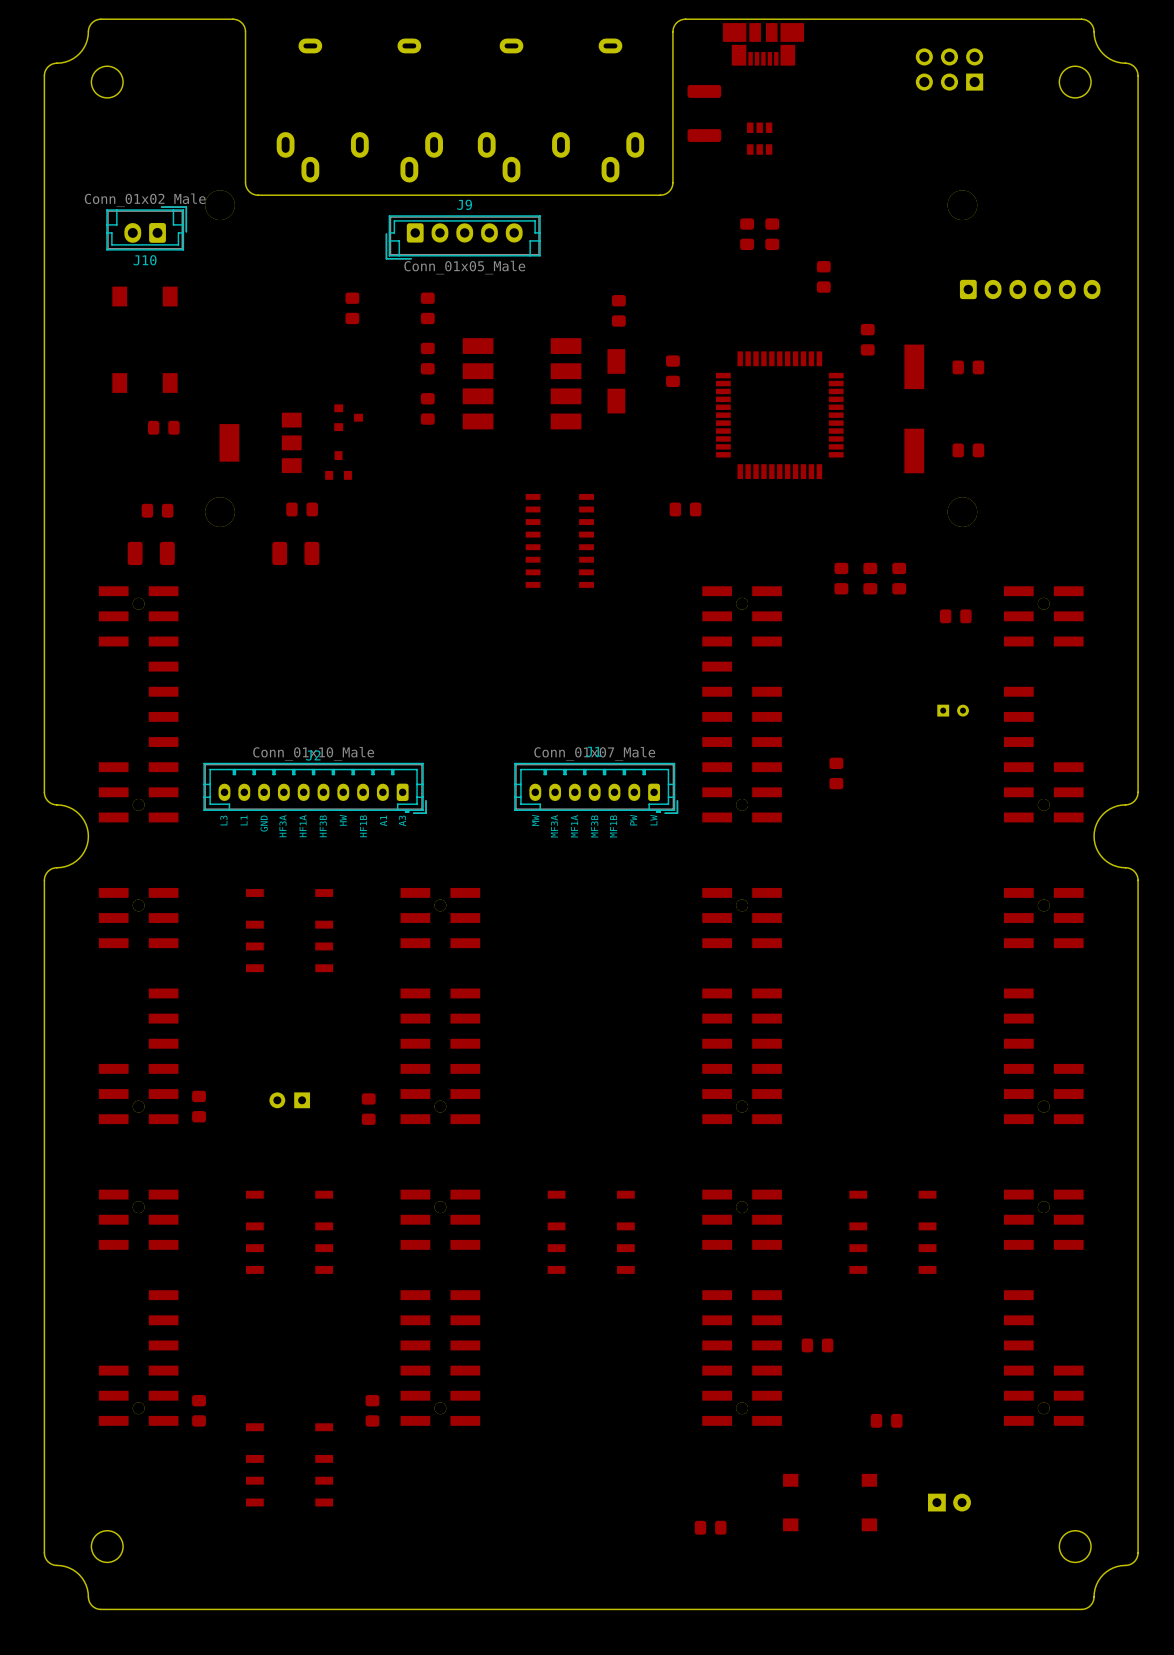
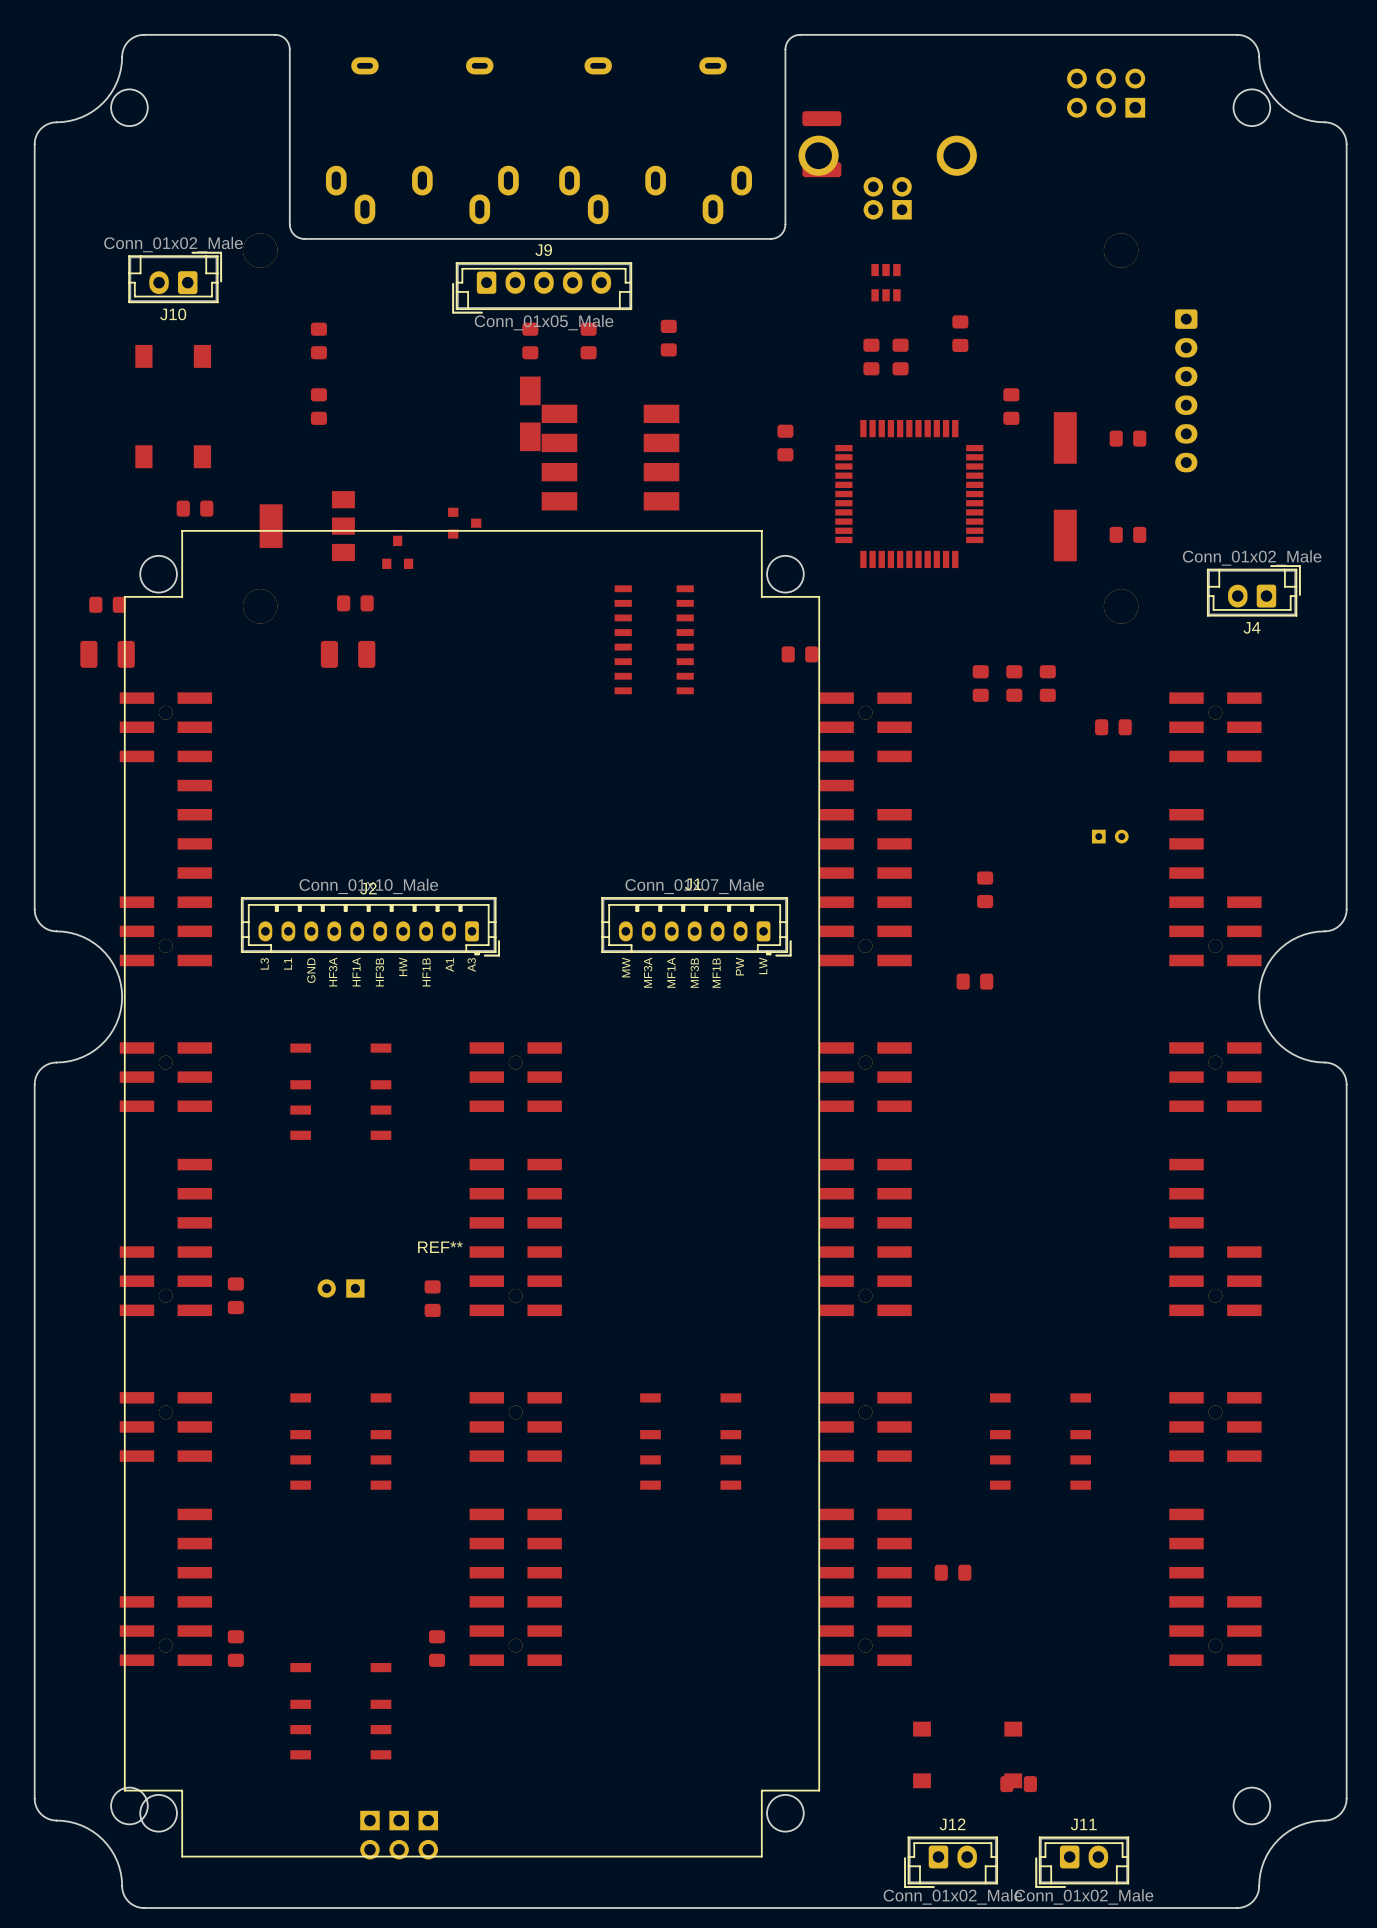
board edge: (119, 19) (99, 19) (93, 21) (88, 28) (86, 43) (79, 54) (68, 60) (50, 64) (46, 69) (44, 75) (44, 792) (46, 798) (50, 803) (68, 807) (79, 814) (86, 824) (88, 836) (86, 848) (79, 858) (68, 865) (50, 869) (46, 874) (44, 880) (44, 1552) (48, 1561) (56, 1565) -> none
board edge: (1062, 19) (1083, 19) (1089, 21) (1093, 28) (1096, 43) (1103, 54) (1113, 60) (1131, 64) (1136, 69) (1138, 75) (1138, 792) (1136, 798) (1131, 803) (1113, 807) (1103, 814) (1096, 824) (1094, 836) (1096, 848) (1103, 858) (1113, 865) (1131, 869) (1136, 874) (1138, 880) (1138, 1552) -> (1237, 34) (1248, 37) (1256, 45) (1264, 81) (1278, 103) (1299, 117) (1335, 125) (1343, 133) (1346, 144) (1346, 912) (1343, 920) (1335, 928) (1304, 934) (1280, 948) (1264, 970) (1259, 996) (1264, 1023) (1280, 1045) (1304, 1059) (1335, 1065) (1343, 1073) (1346, 1081) (1346, 1798) (1343, 1809) (1335, 1817) (1299, 1825) (1278, 1839) (1264, 1861) (1256, 1897) (1248, 1905) (1237, 1908) (141, 1907) (133, 1905) (125, 1897) (117, 1861) (102, 1839) (81, 1825) (48, 1818) (37, 1809) (34, 1798) (34, 1081) (37, 1073) (45, 1065) (76, 1059) (100, 1045) (116, 1023) (122, 996) (116, 970) (100, 948) (76, 934) (45, 928) (37, 920) (34, 912) (34, 144) (37, 133) (45, 125) (81, 117) (102, 103) (117, 81) (125, 45) (133, 37) (144, 34)
part: (763, 44) -> none
part footprint: [747, 122, 773, 155] -> [798, 135, 977, 220]
part: none -> (885, 282)
part: (747, 234) -> none
part: (772, 234) -> none
part: none -> (318, 340)
part: none -> (588, 340)
part rotation: 0° (1030, 289) -> 90° clockwise (1186, 390)
part: none -> (871, 357)
part: none -> (900, 357)
part: (352, 308) -> none
part position: (427, 308) -> (530, 340)
part position: (618, 310) -> (668, 338)
part: none -> (318, 406)
part: (427, 358) -> none
part position: (616, 381) -> (530, 413)
part: (427, 408) -> none
part position: (348, 417) -> (464, 523)
J4: none -> Conn_01x02_Male (1253, 590)
part position: (685, 509) -> (799, 654)
part position: (157, 510) -> (107, 604)
part position: (151, 553) -> (107, 654)
part position: (836, 773) -> (985, 889)
part: none -> (974, 981)
REF**: none -> (472, 1193)
part: (886, 1420) -> none
part: (949, 1502) -> none
part: (710, 1527) -> none
part: none -> (1018, 1784)
board edge: (1138, 1552) (1136, 1559) (1131, 1563) (1113, 1567) (1103, 1574) (1096, 1584) (1092, 1603) (1087, 1607) (1081, 1609) (100, 1609) (94, 1607) (90, 1603) (86, 1584) (79, 1574) (68, 1567) (56, 1565) -> none
part: none -> (369, 1835)
part: none -> (399, 1835)
part: none -> (428, 1835)
J12: none -> Conn_01x02_Male (951, 1862)
J11: none -> Conn_01x02_Male (1082, 1862)

